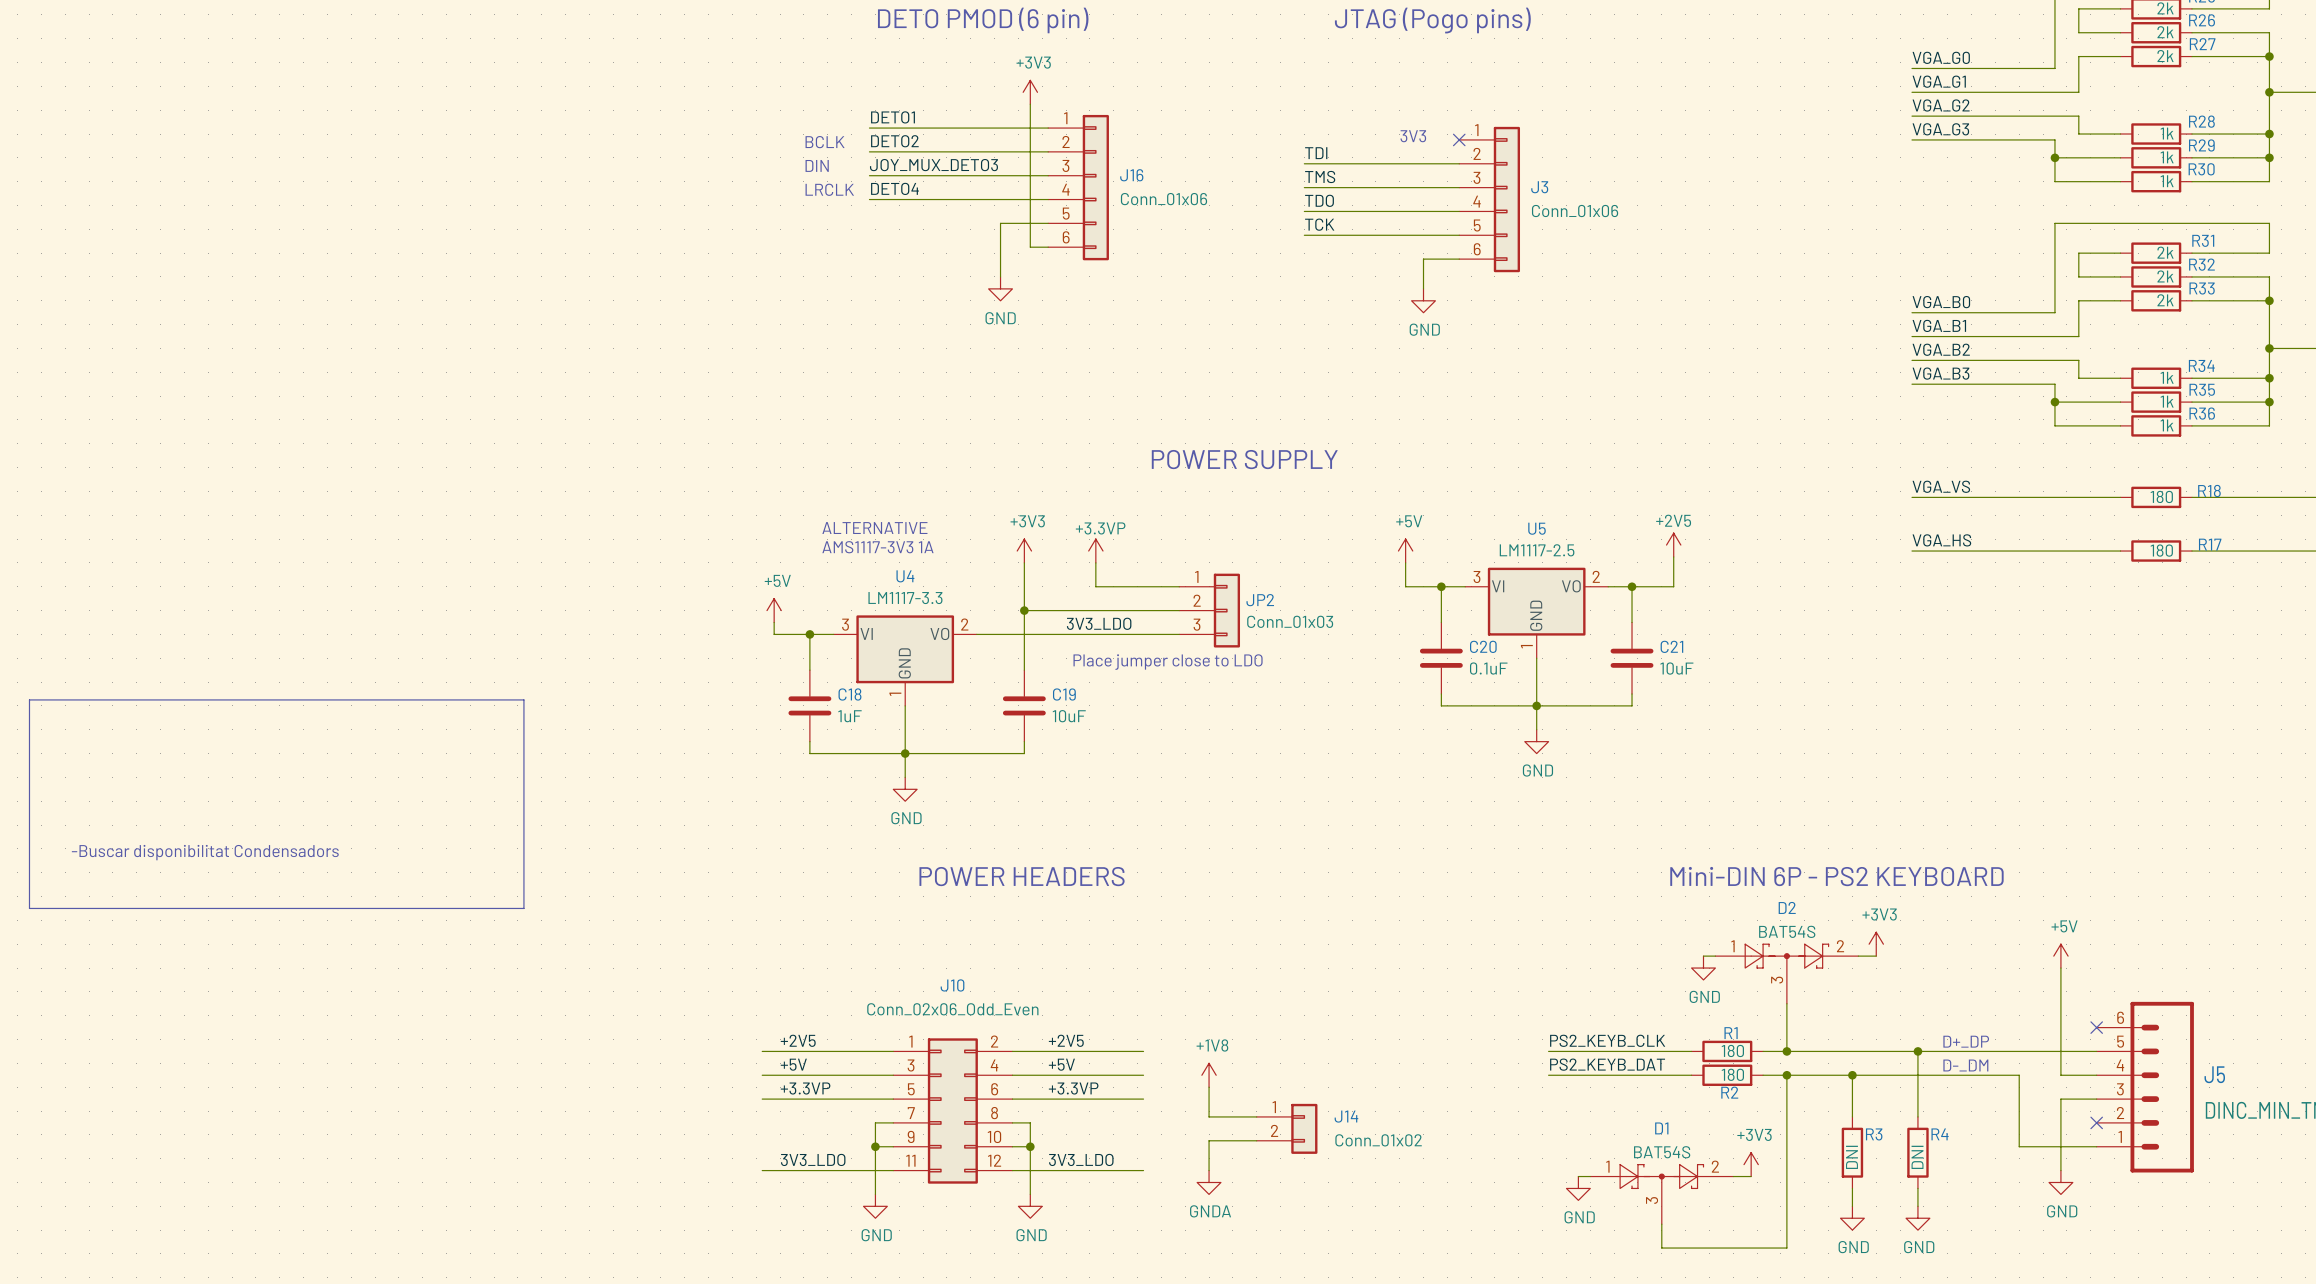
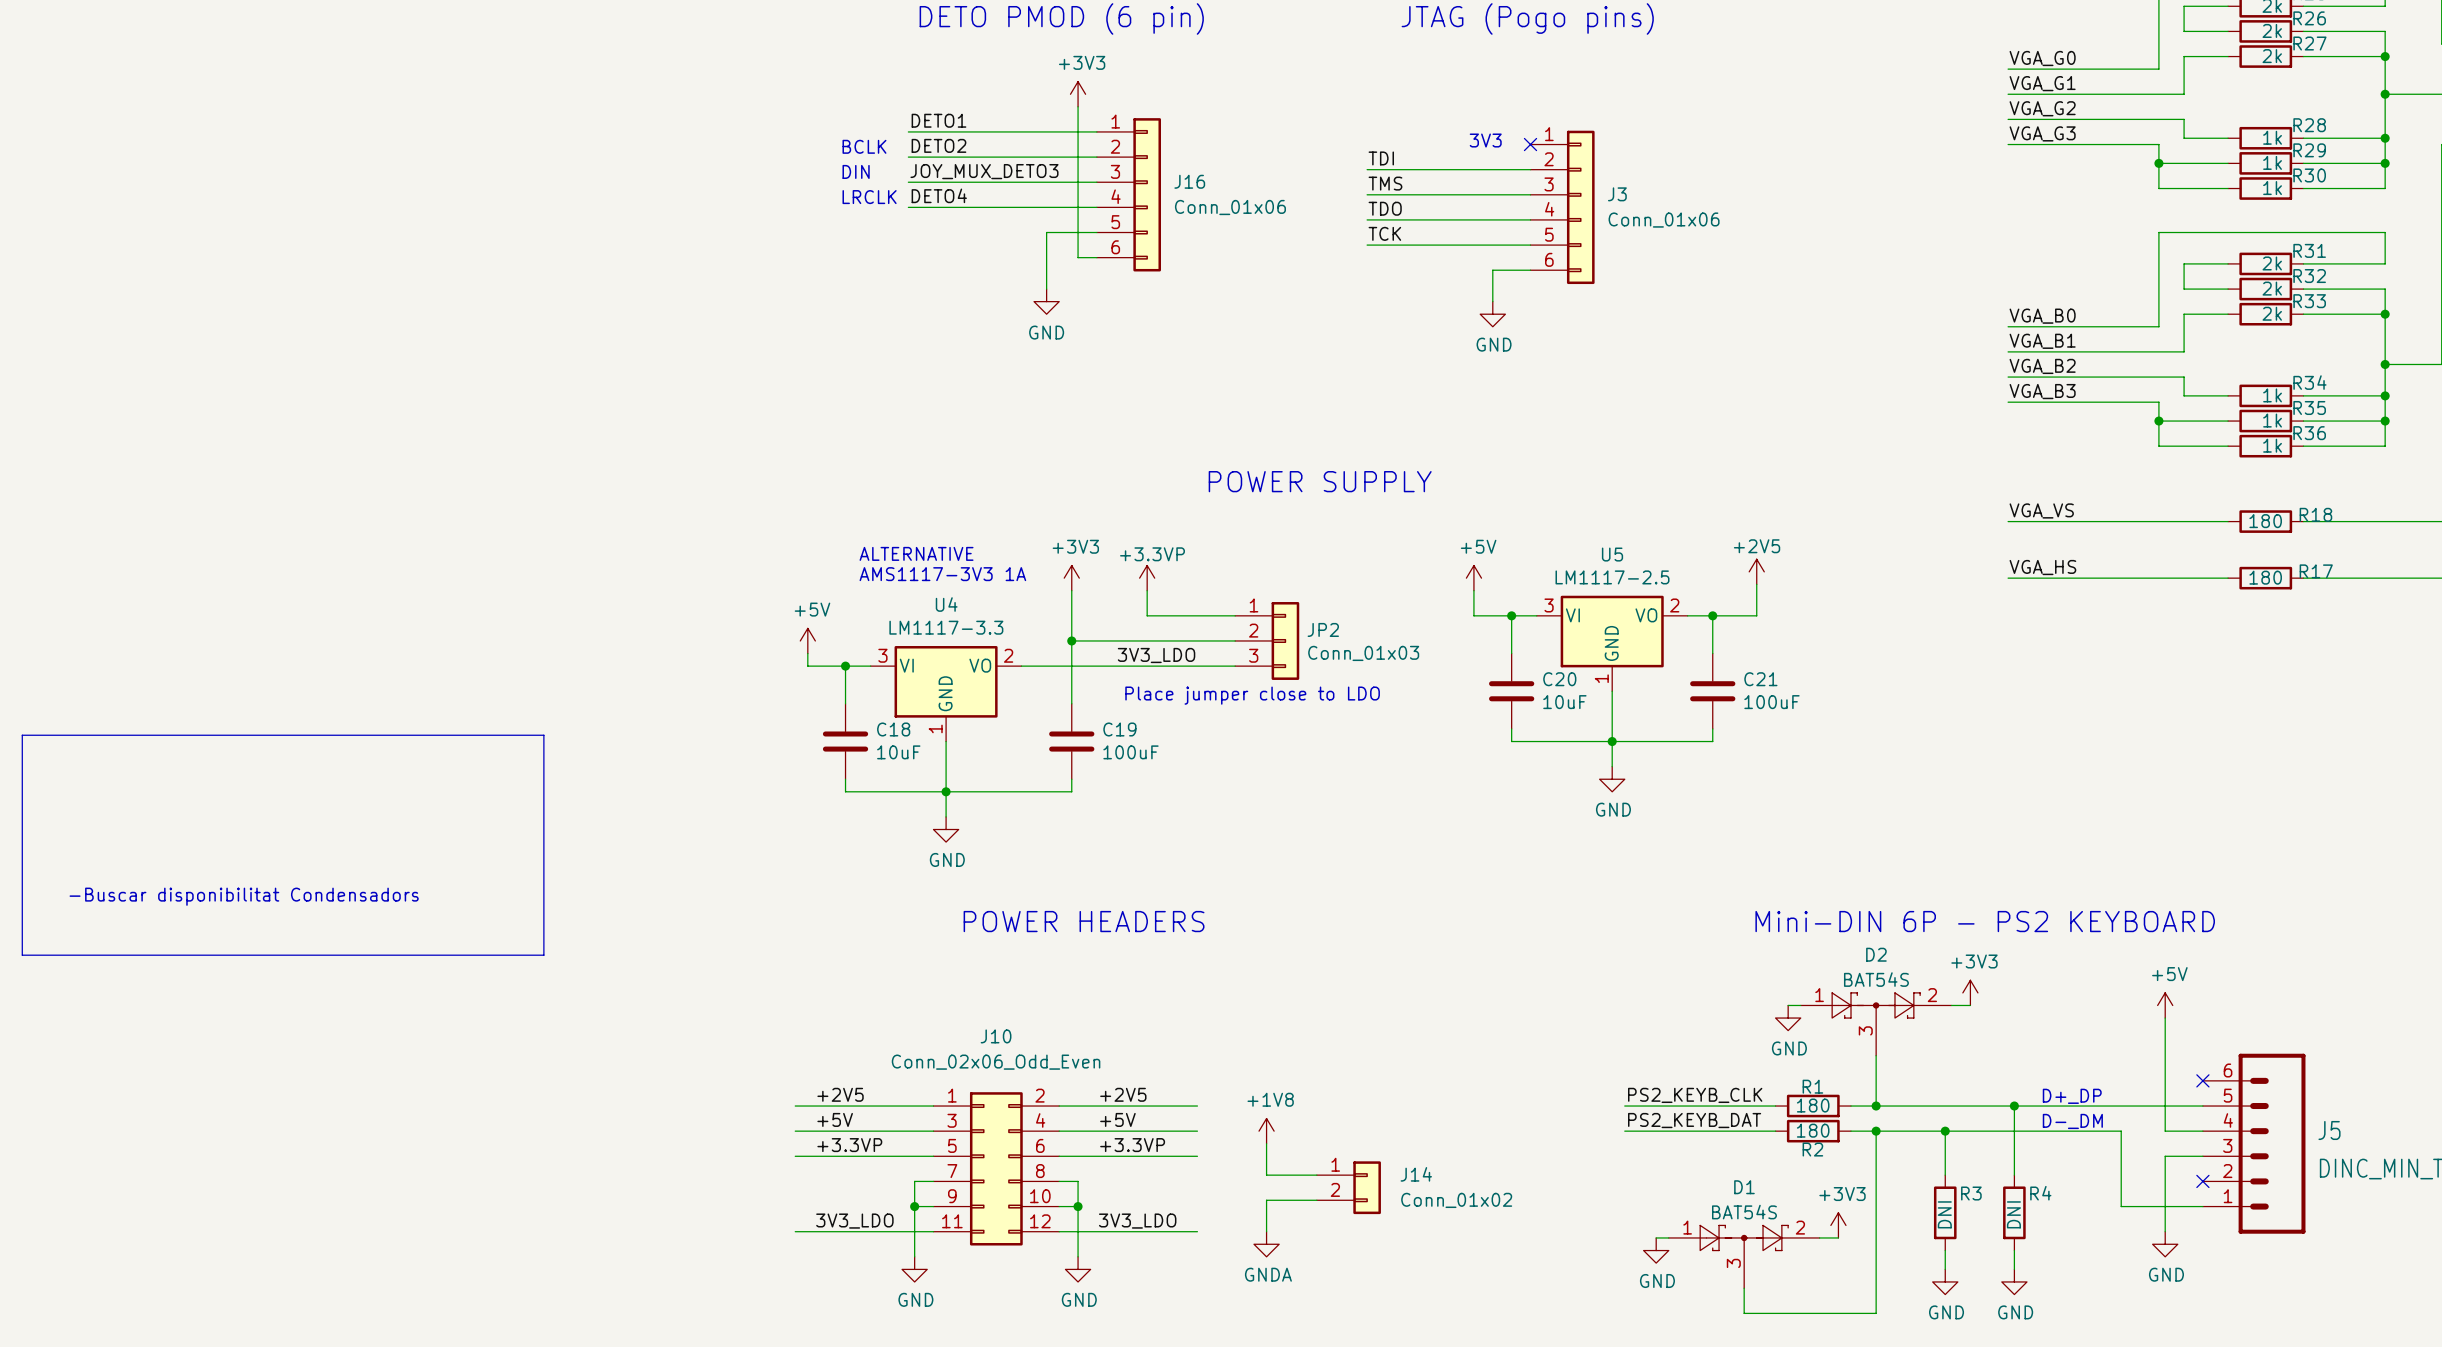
C20 value: 0.1uF (1488, 668) -> 10uF (1564, 702)
C21 value: 10uF (1676, 668) -> 100uF (1771, 702)
C18 value: 1uF (849, 716) -> 10uF (898, 752)
C19 value: 10uF (1069, 716) -> 100uF (1130, 752)

